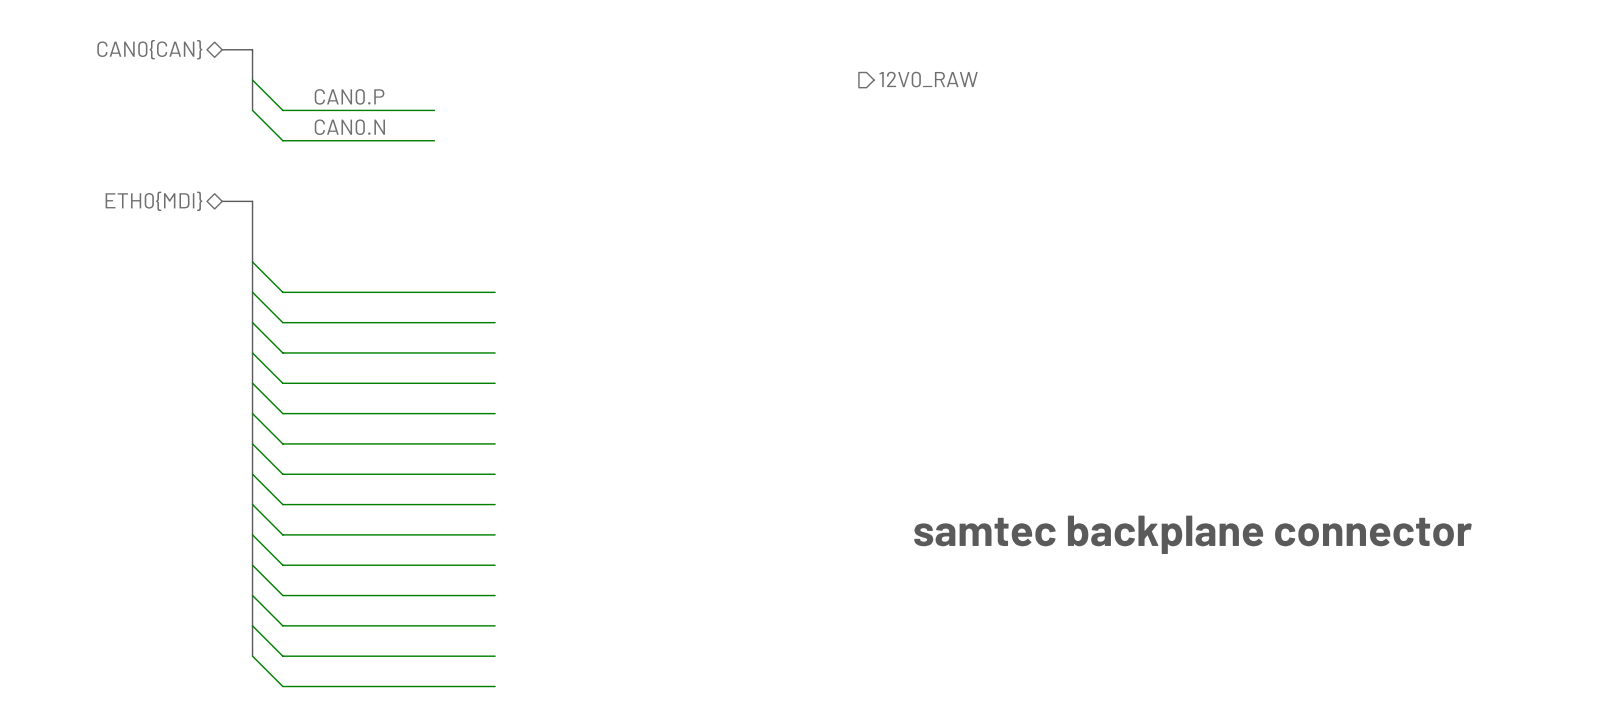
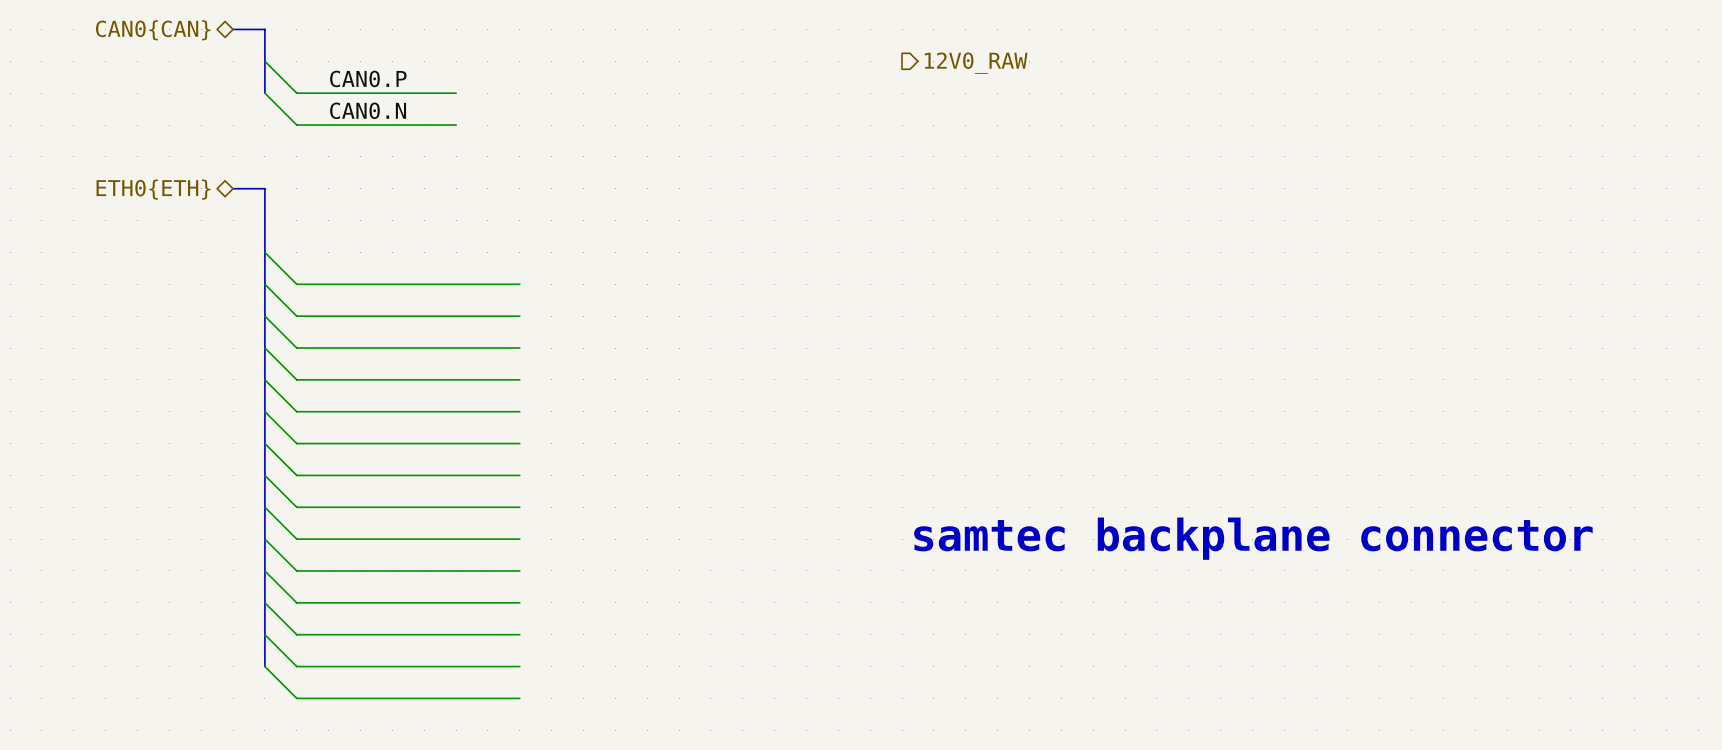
hierarchical label: ETH0{MDI} (153, 201) -> ETH0{ETH} (153, 189)

